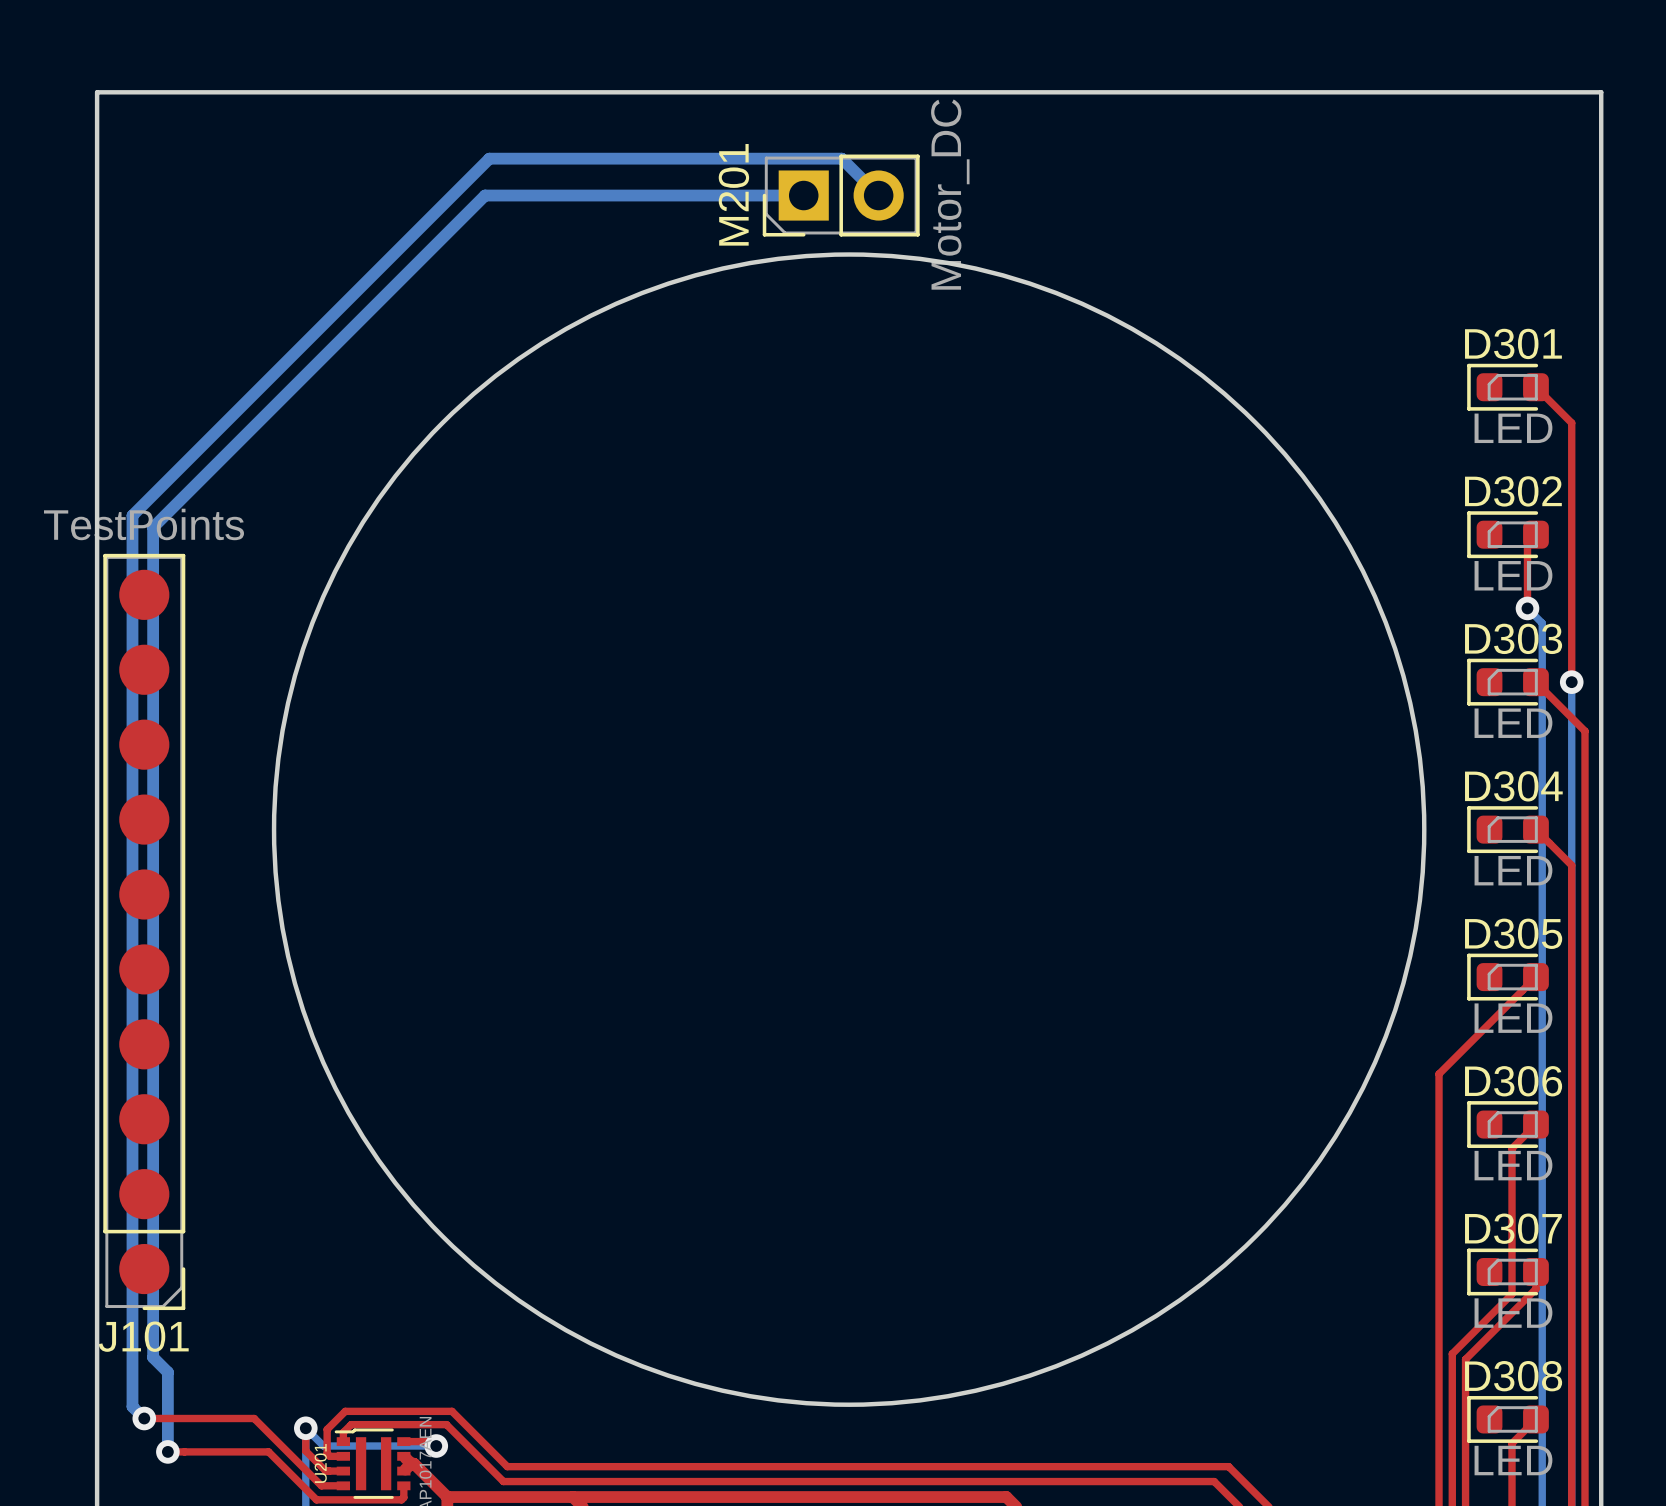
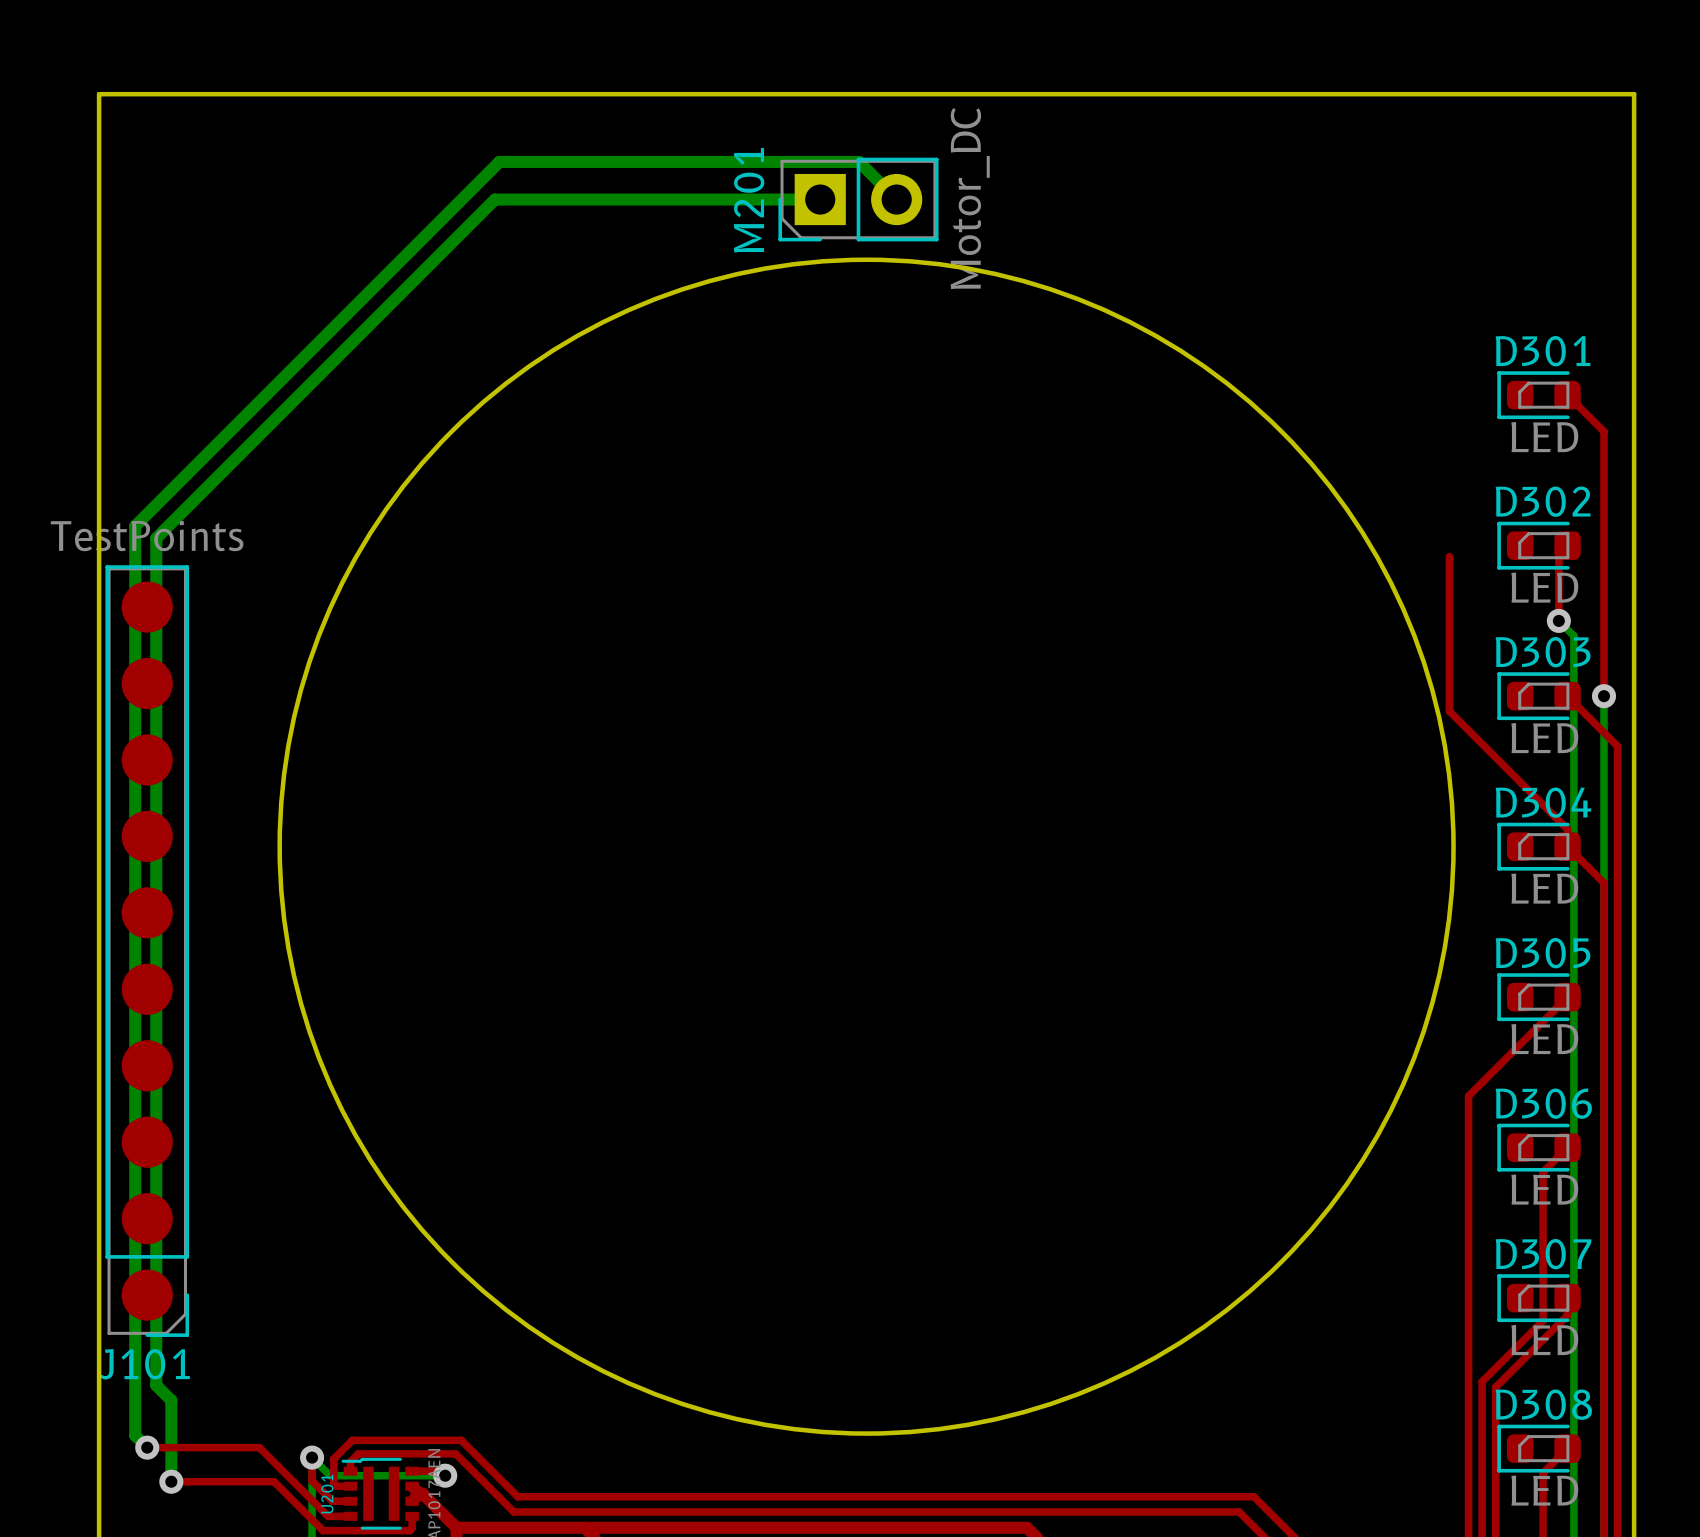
top track: none -> (1449, 556) (1449, 711) (1567, 829) (1567, 846)

